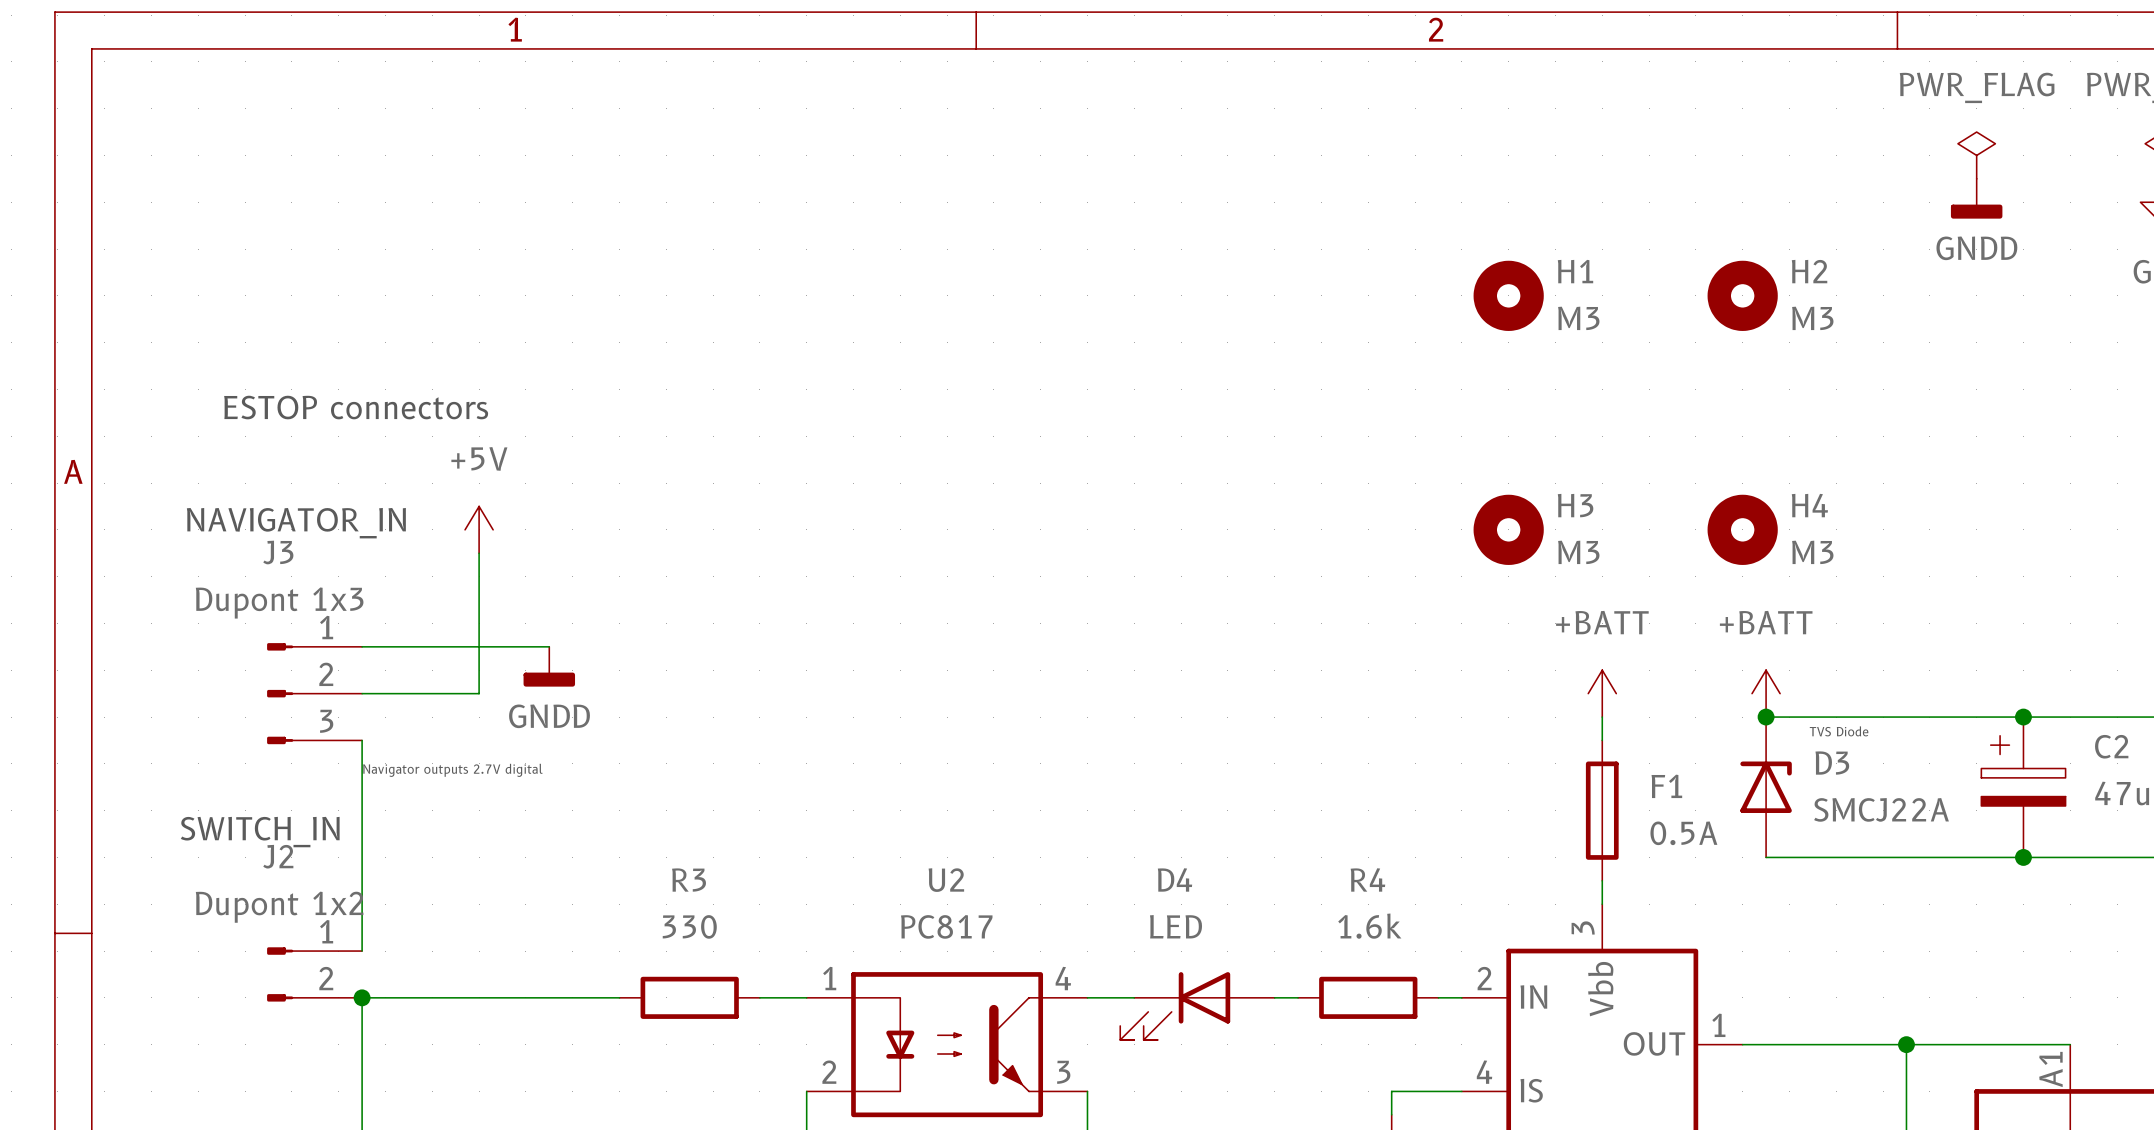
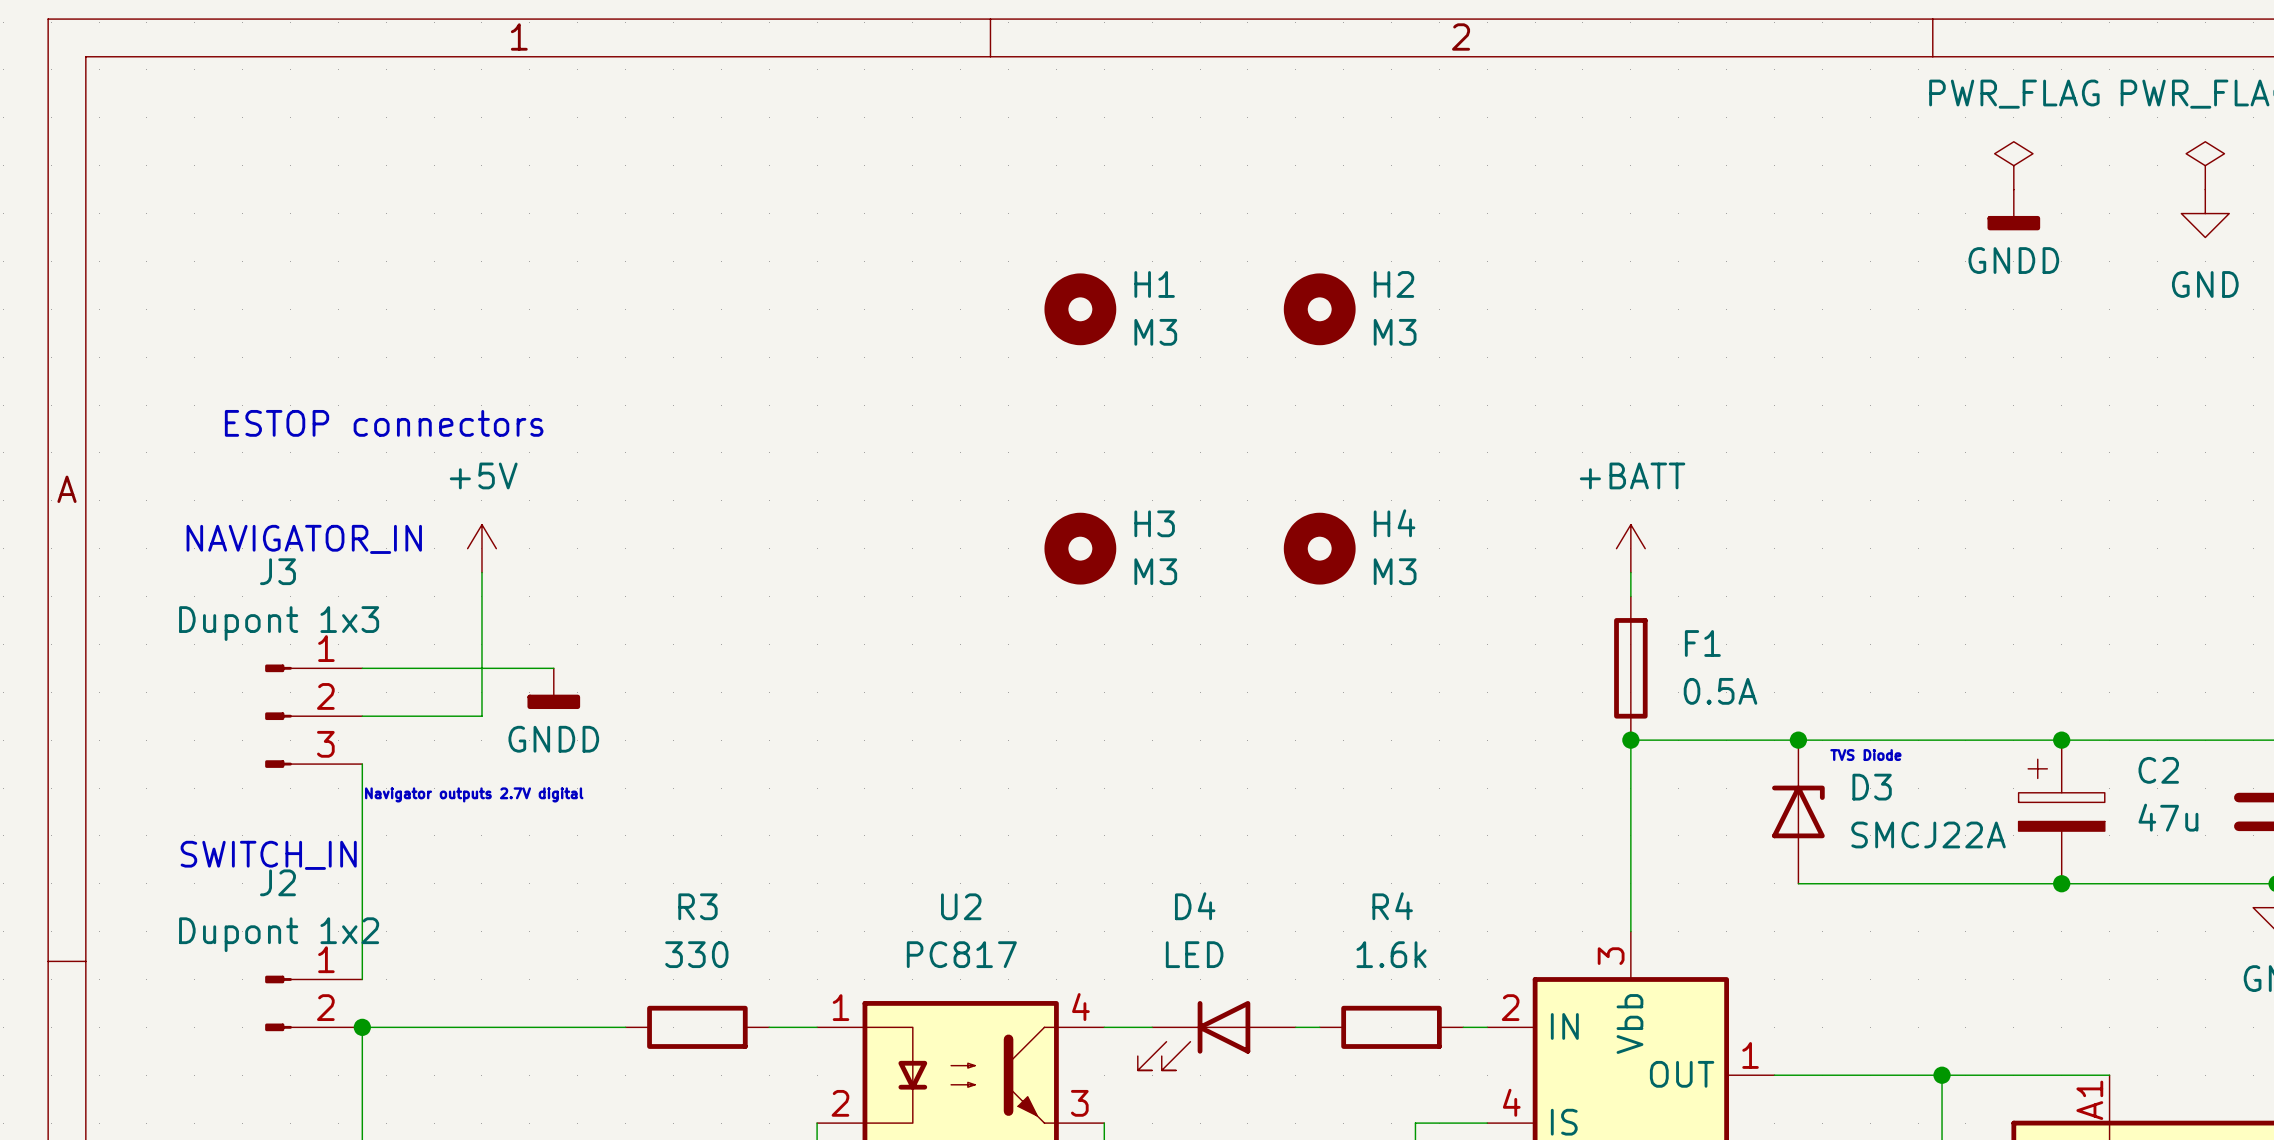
H1 position: (1508, 295) -> (1080, 309)
H2 position: (1742, 295) -> (1319, 309)
H3 position: (1508, 529) -> (1080, 548)
power symbol: none -> +BATT (1630, 548)
H4 position: (1742, 529) -> (1319, 548)
wire: none -> (1630, 572) (1630, 596)
power symbol: +BATT (1602, 693) -> none
power symbol: +BATT (1766, 693) -> none
wire: none -> (1630, 740) (1798, 740)
junction: none -> (1630, 740)
F1 position: (1602, 810) -> (1630, 668)

